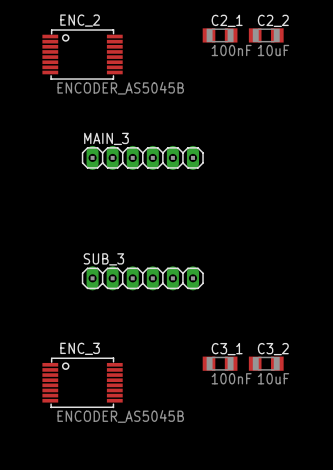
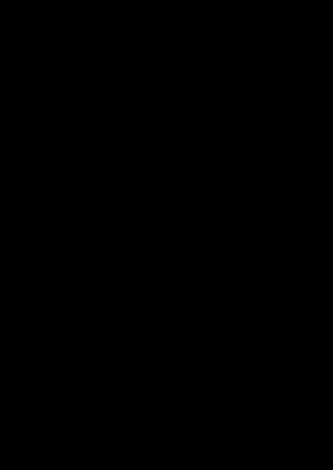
C2_1: 100nF (220, 35) -> none
C2_2: 10uF (266, 35) -> none
ENC_2: ENCODER_AS5045B (82, 54) -> none
MAIN_3: (142, 157) -> none
SUB_3: (142, 278) -> none
C3_1: 100nF (220, 363) -> none
C3_2: 10uF (266, 363) -> none
ENC_3: ENCODER_AS5045B (82, 382) -> none

